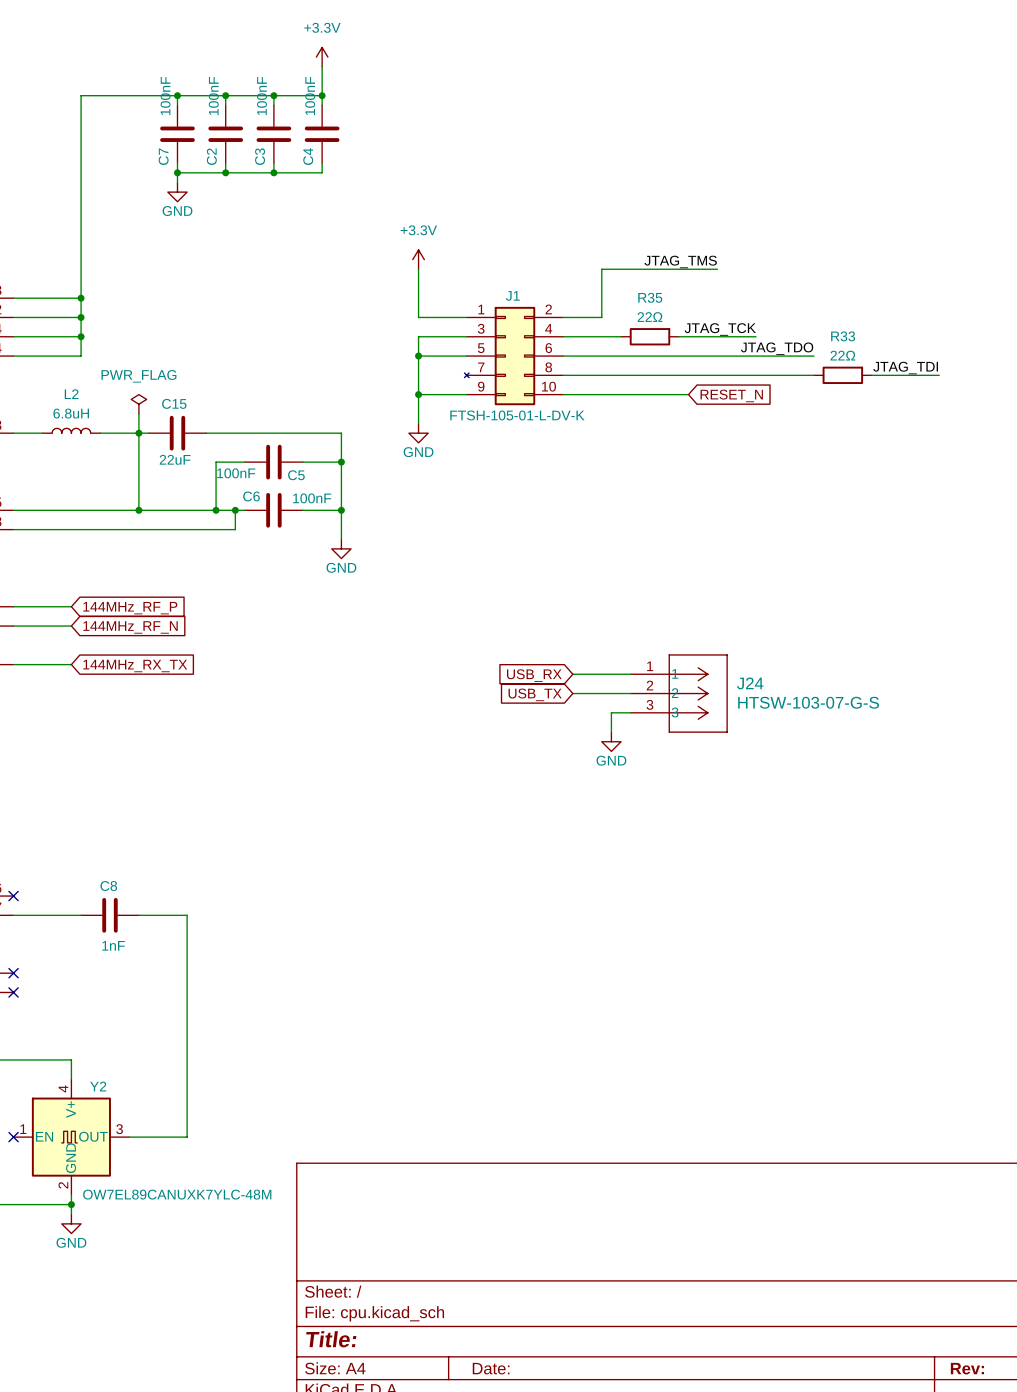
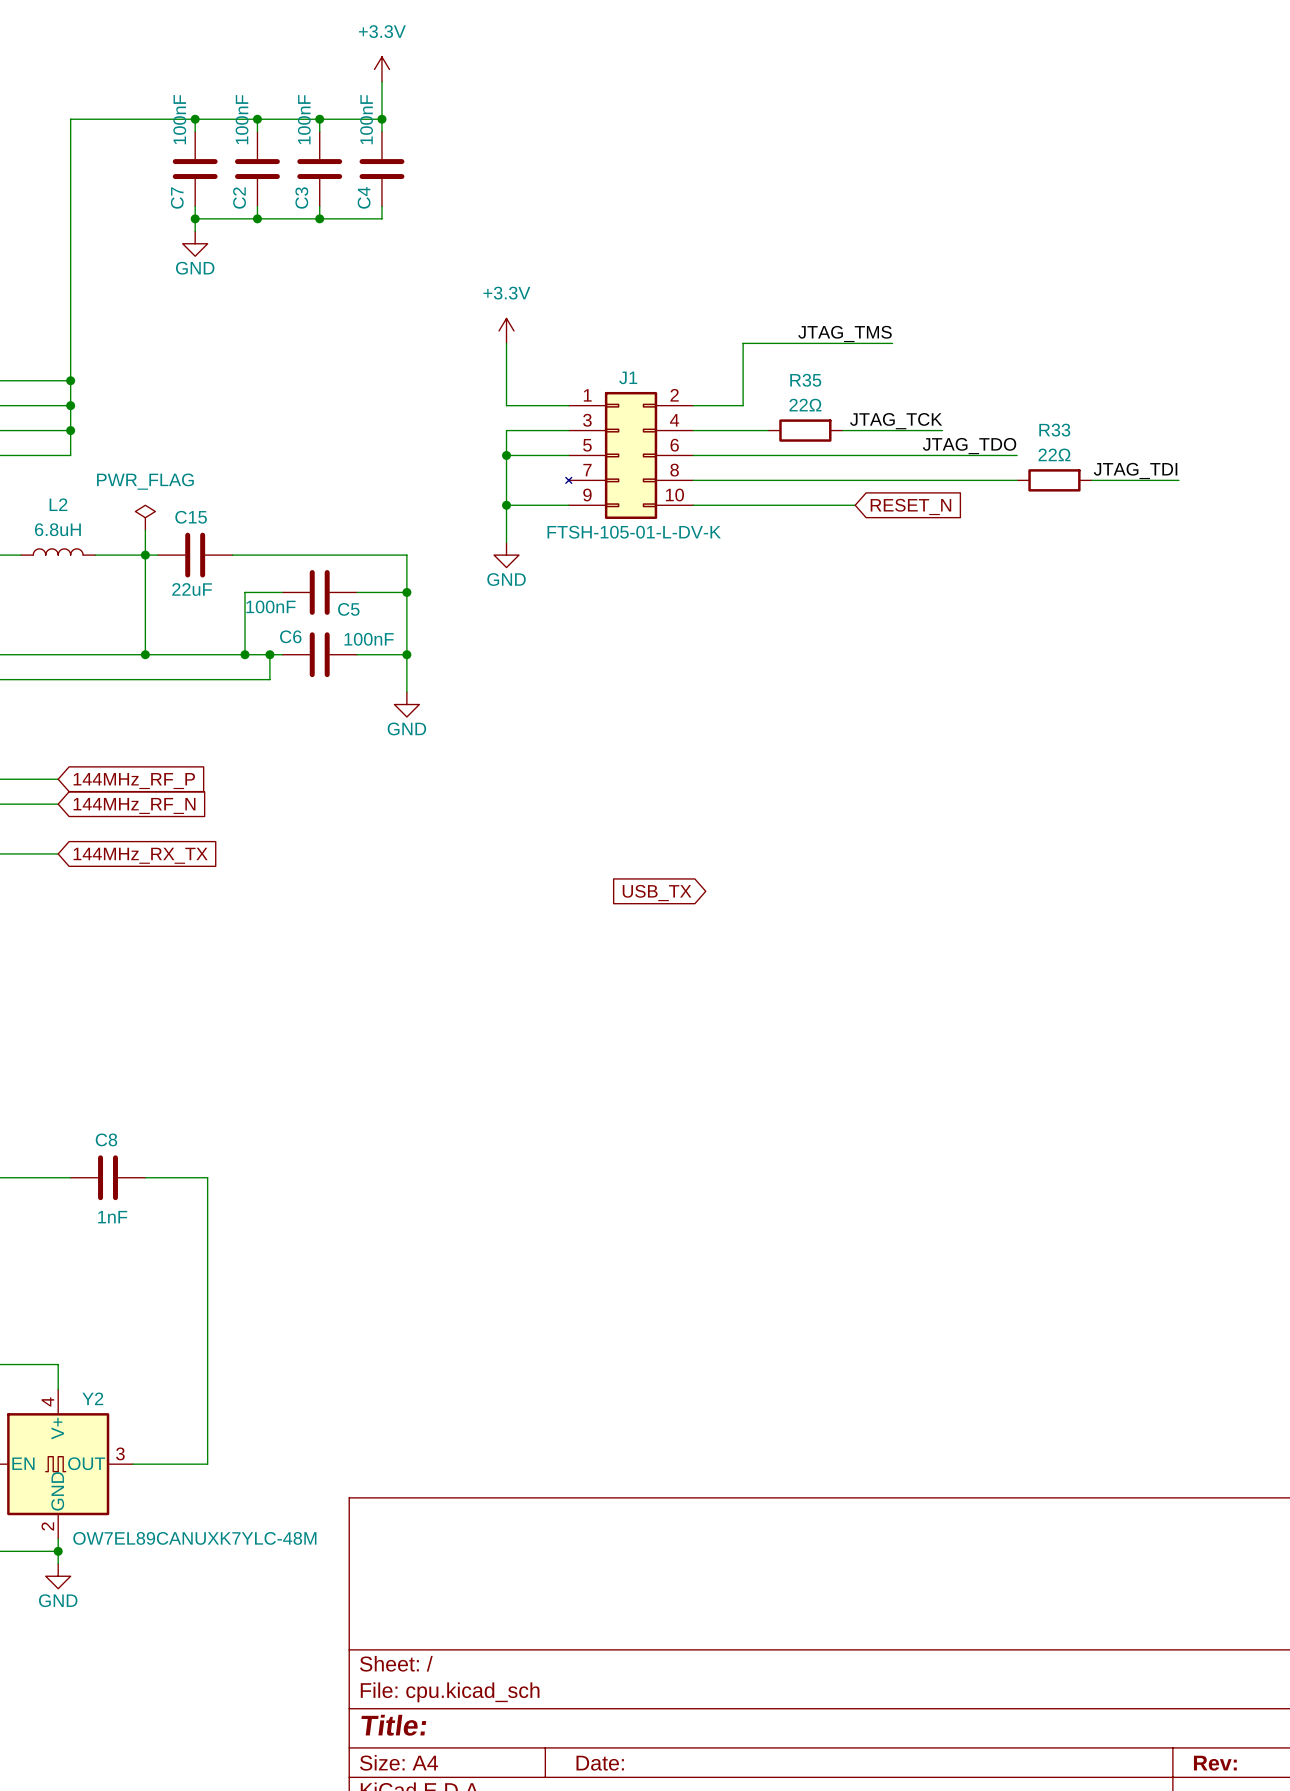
wire: (572, 674) (630, 674) -> none
global label: USB_RX (534, 675) -> none
wire: (572, 693) (630, 693) -> none
J24: HTSW-103-07-G-S (679, 693) -> none
wire: (630, 712) (611, 712) (611, 732) -> none
power symbol: GND (611, 741) -> none

